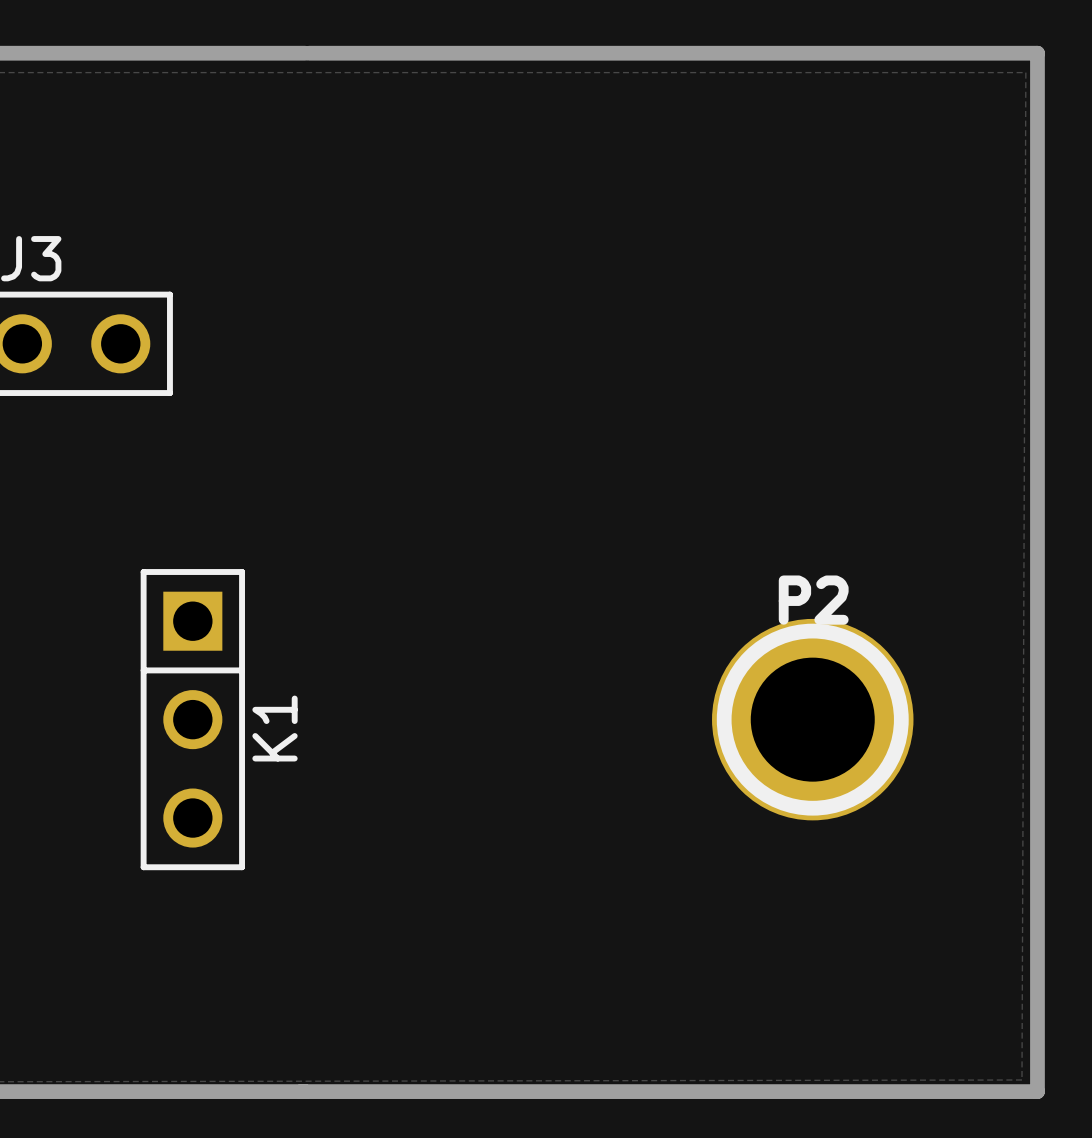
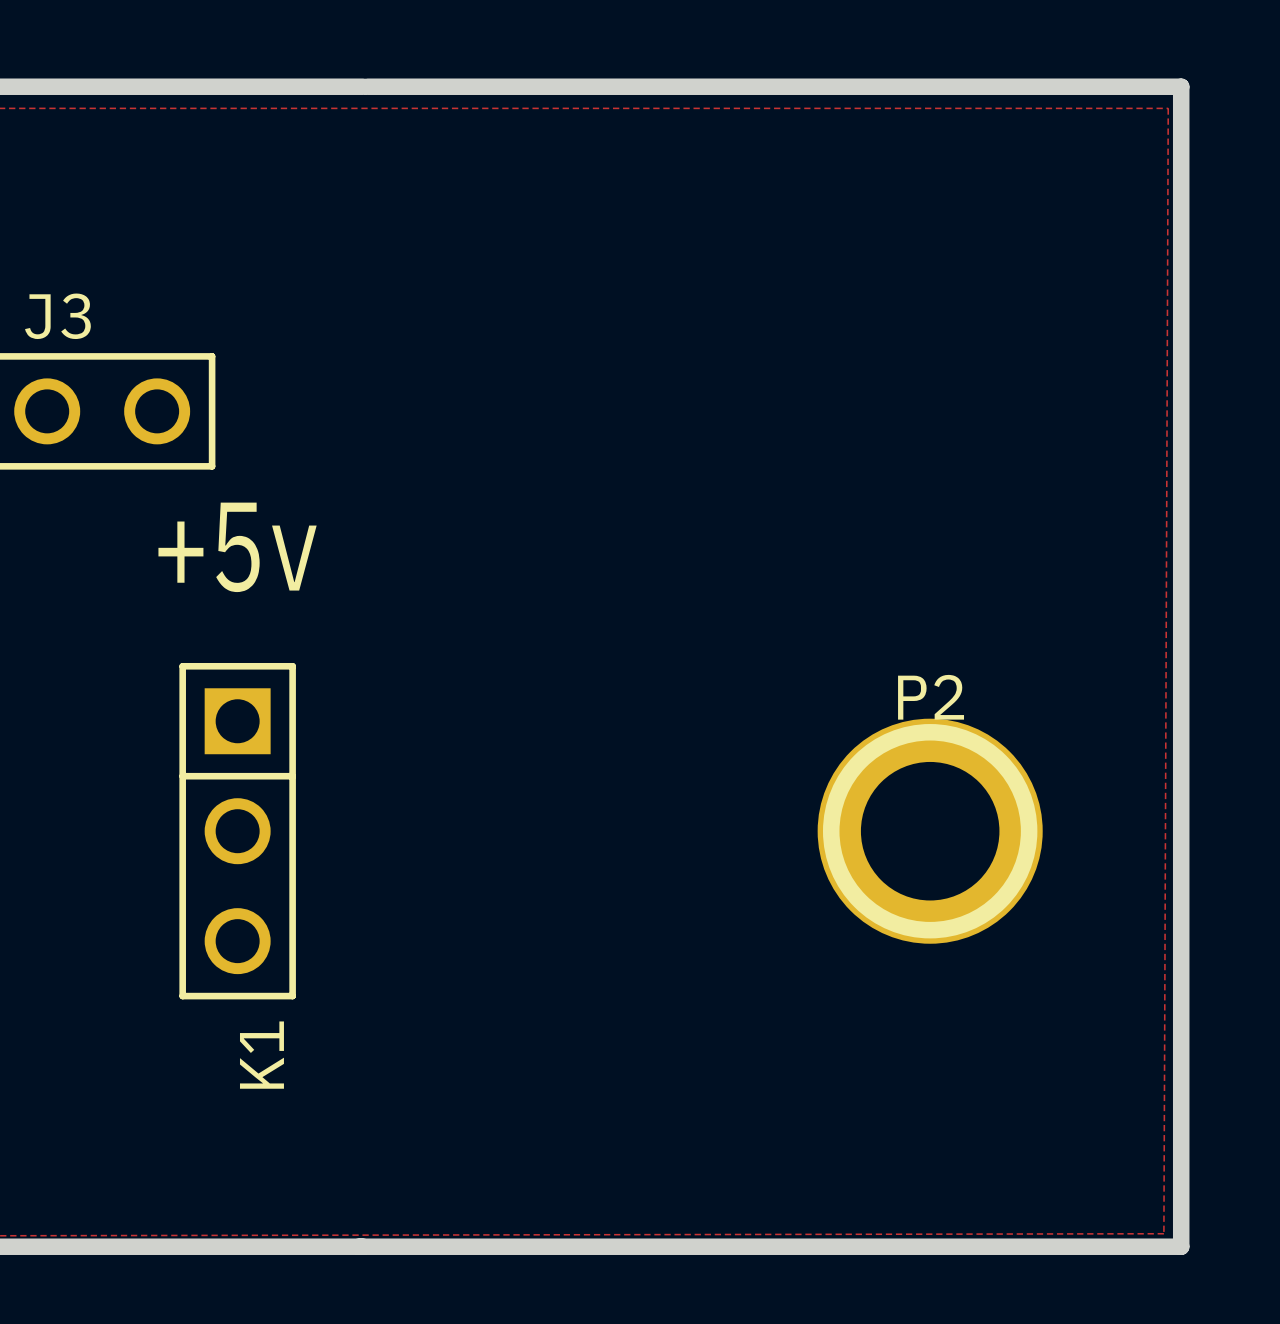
text: none -> +5v (237, 547)
K1 name position: K1 (275, 728) -> K1 (261, 1055)

